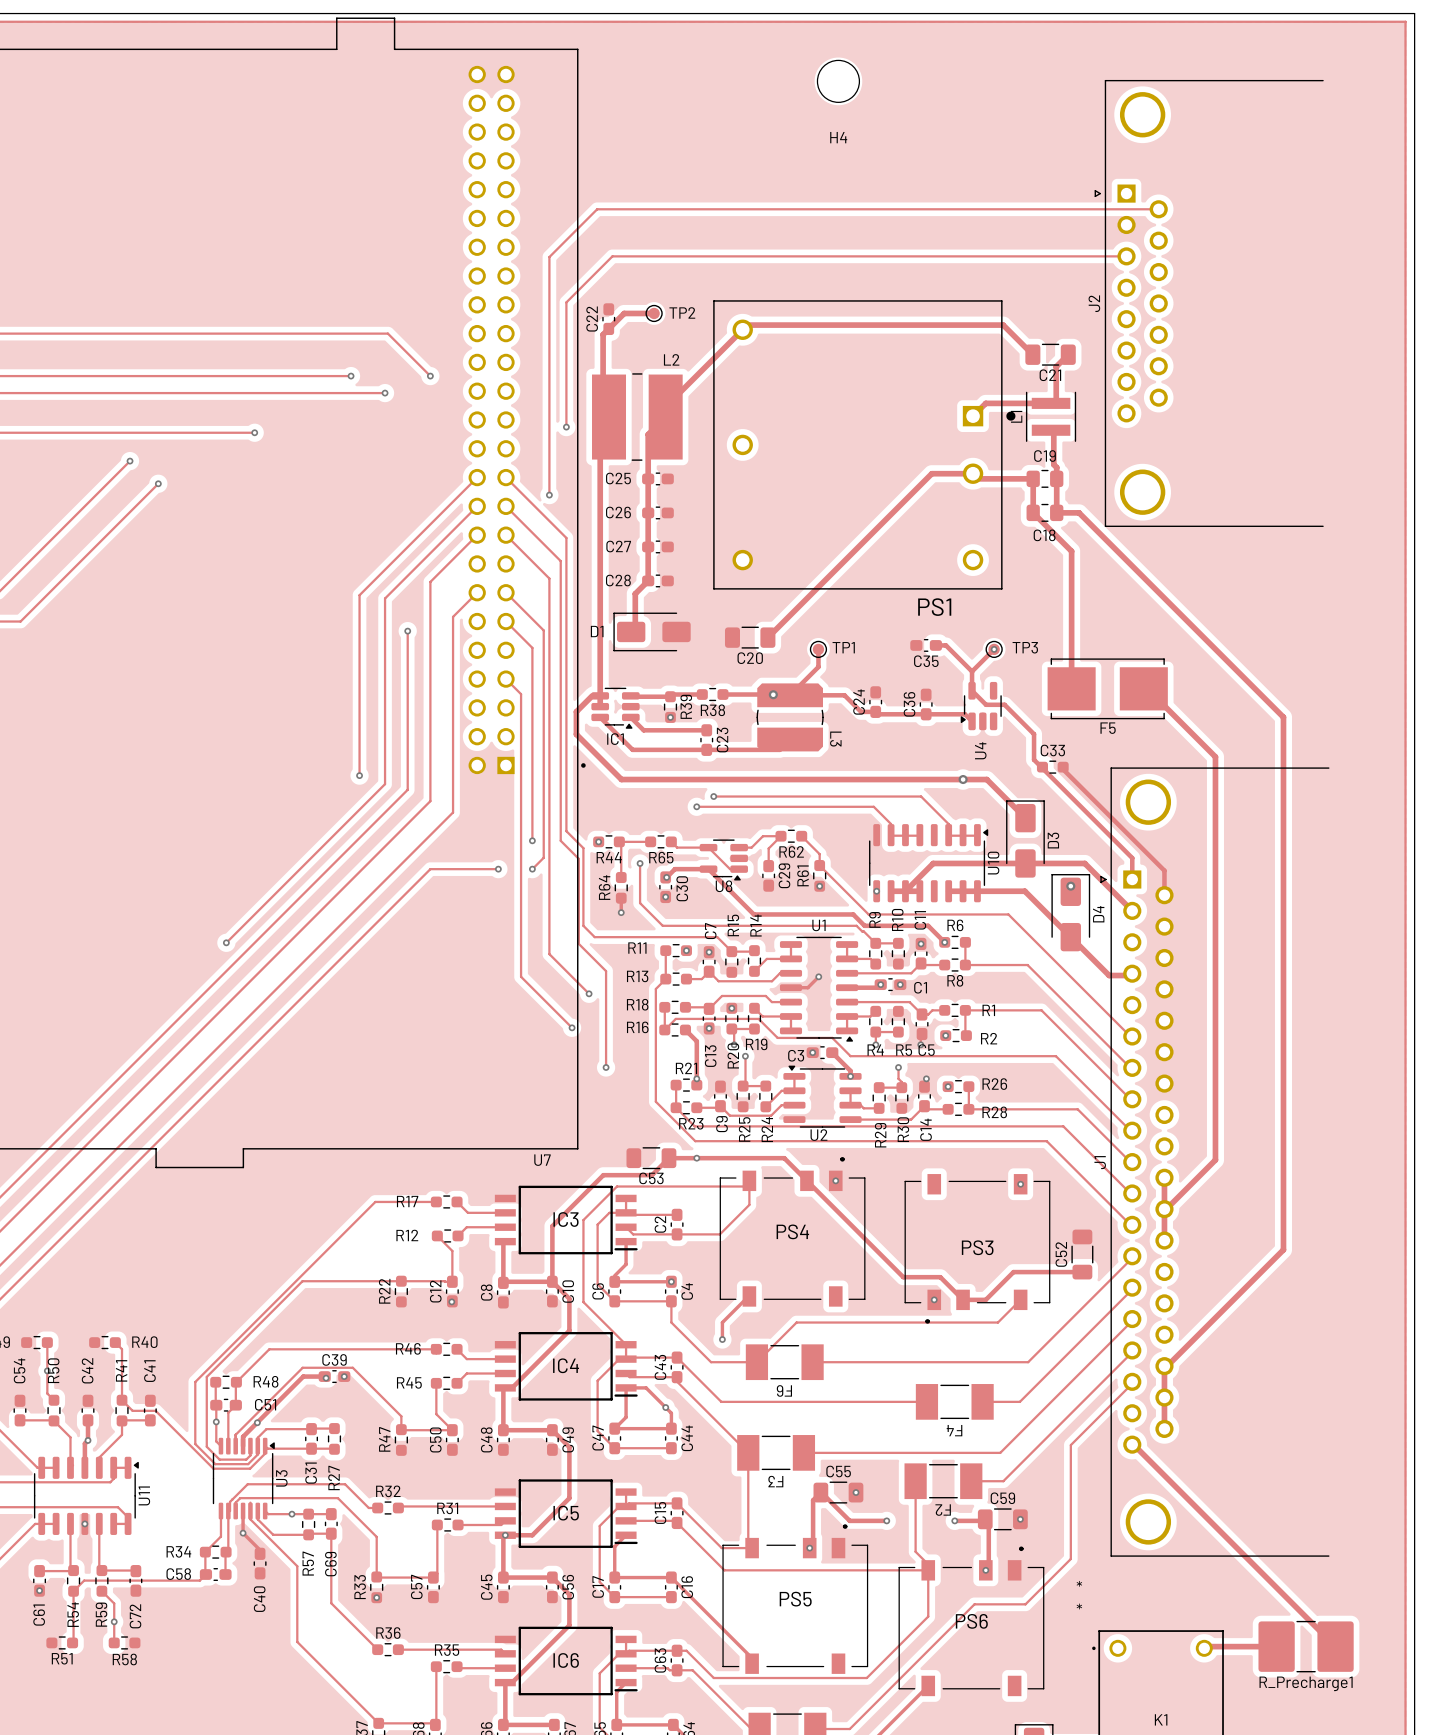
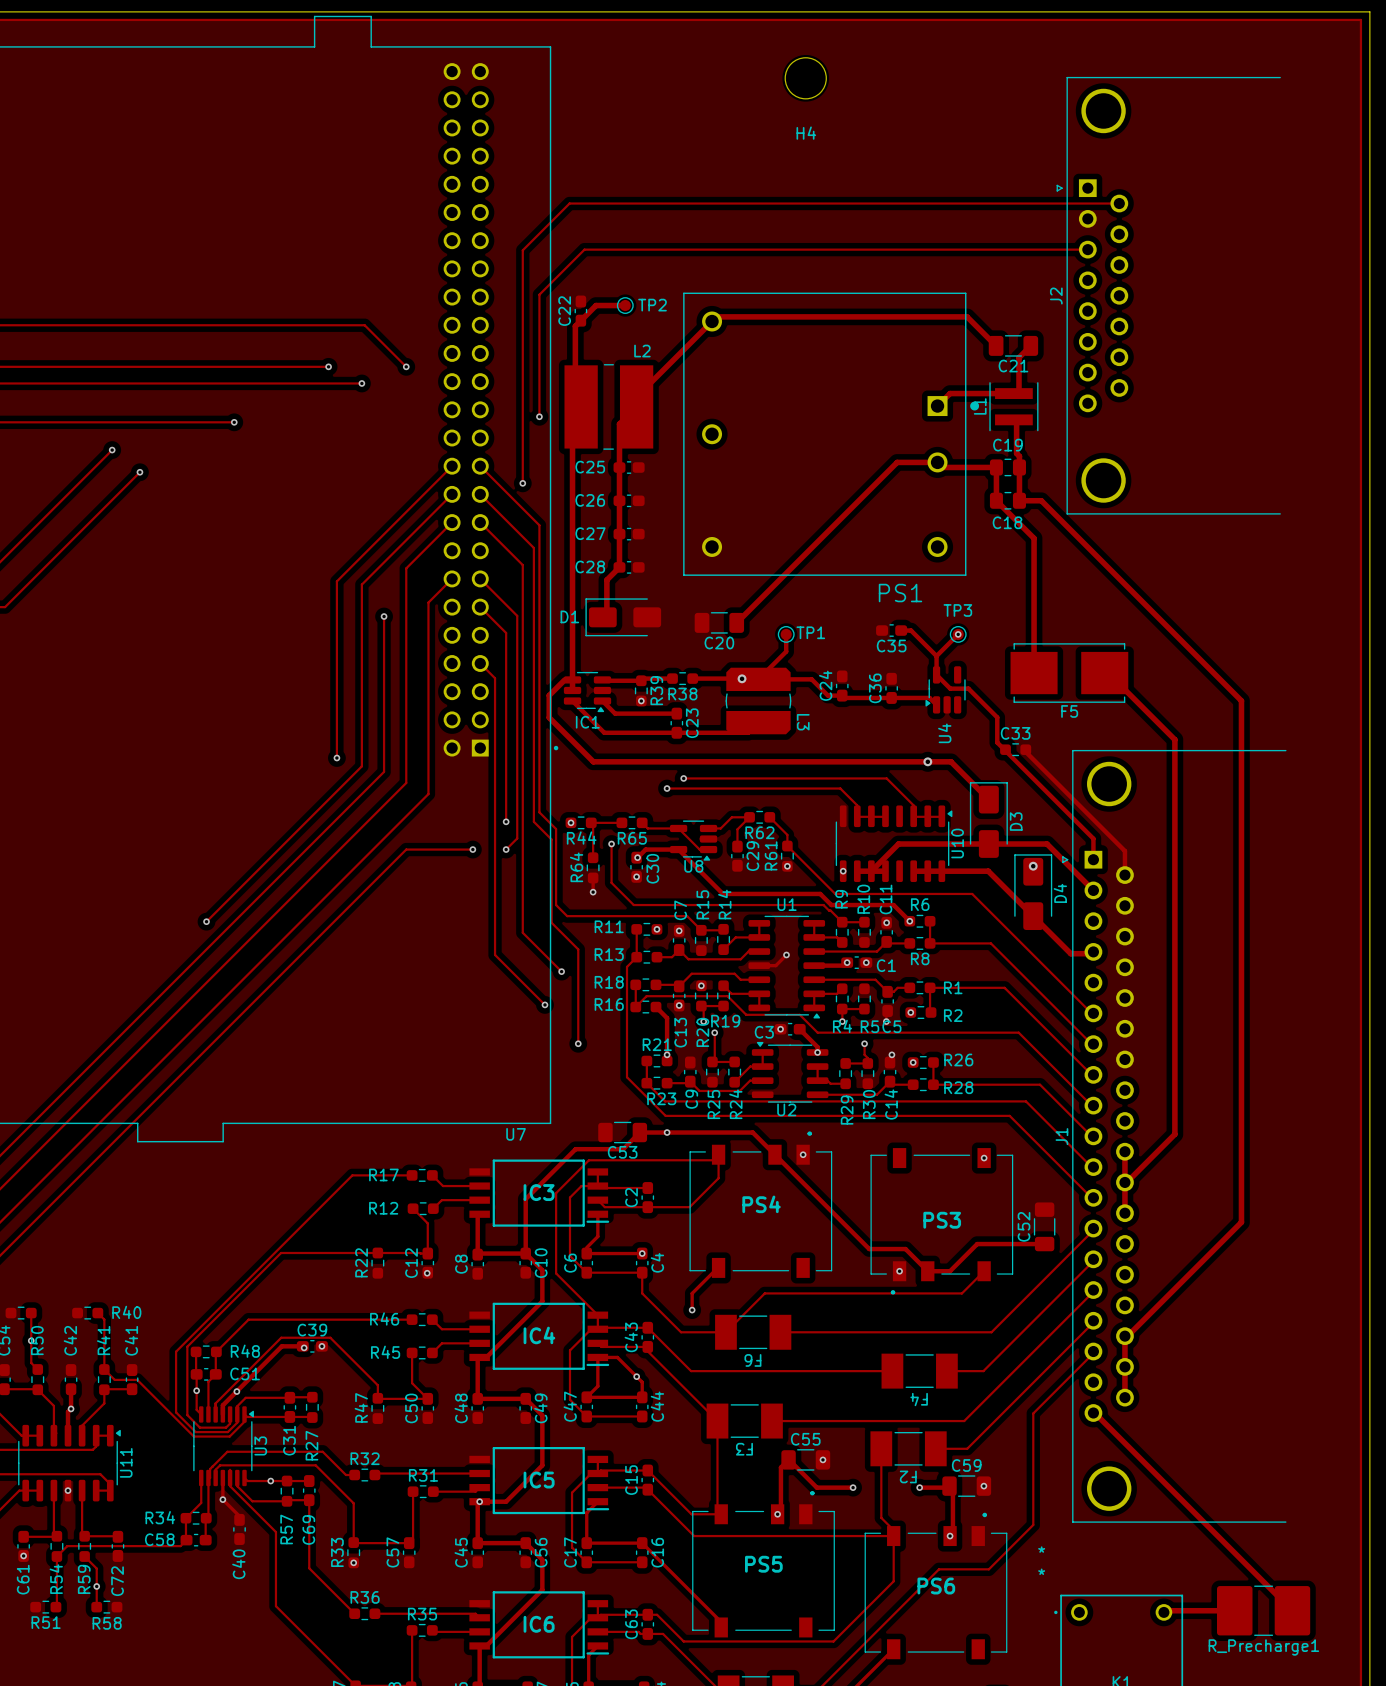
TP3 name position: TP3 (1025, 647) -> TP3 (957, 610)

